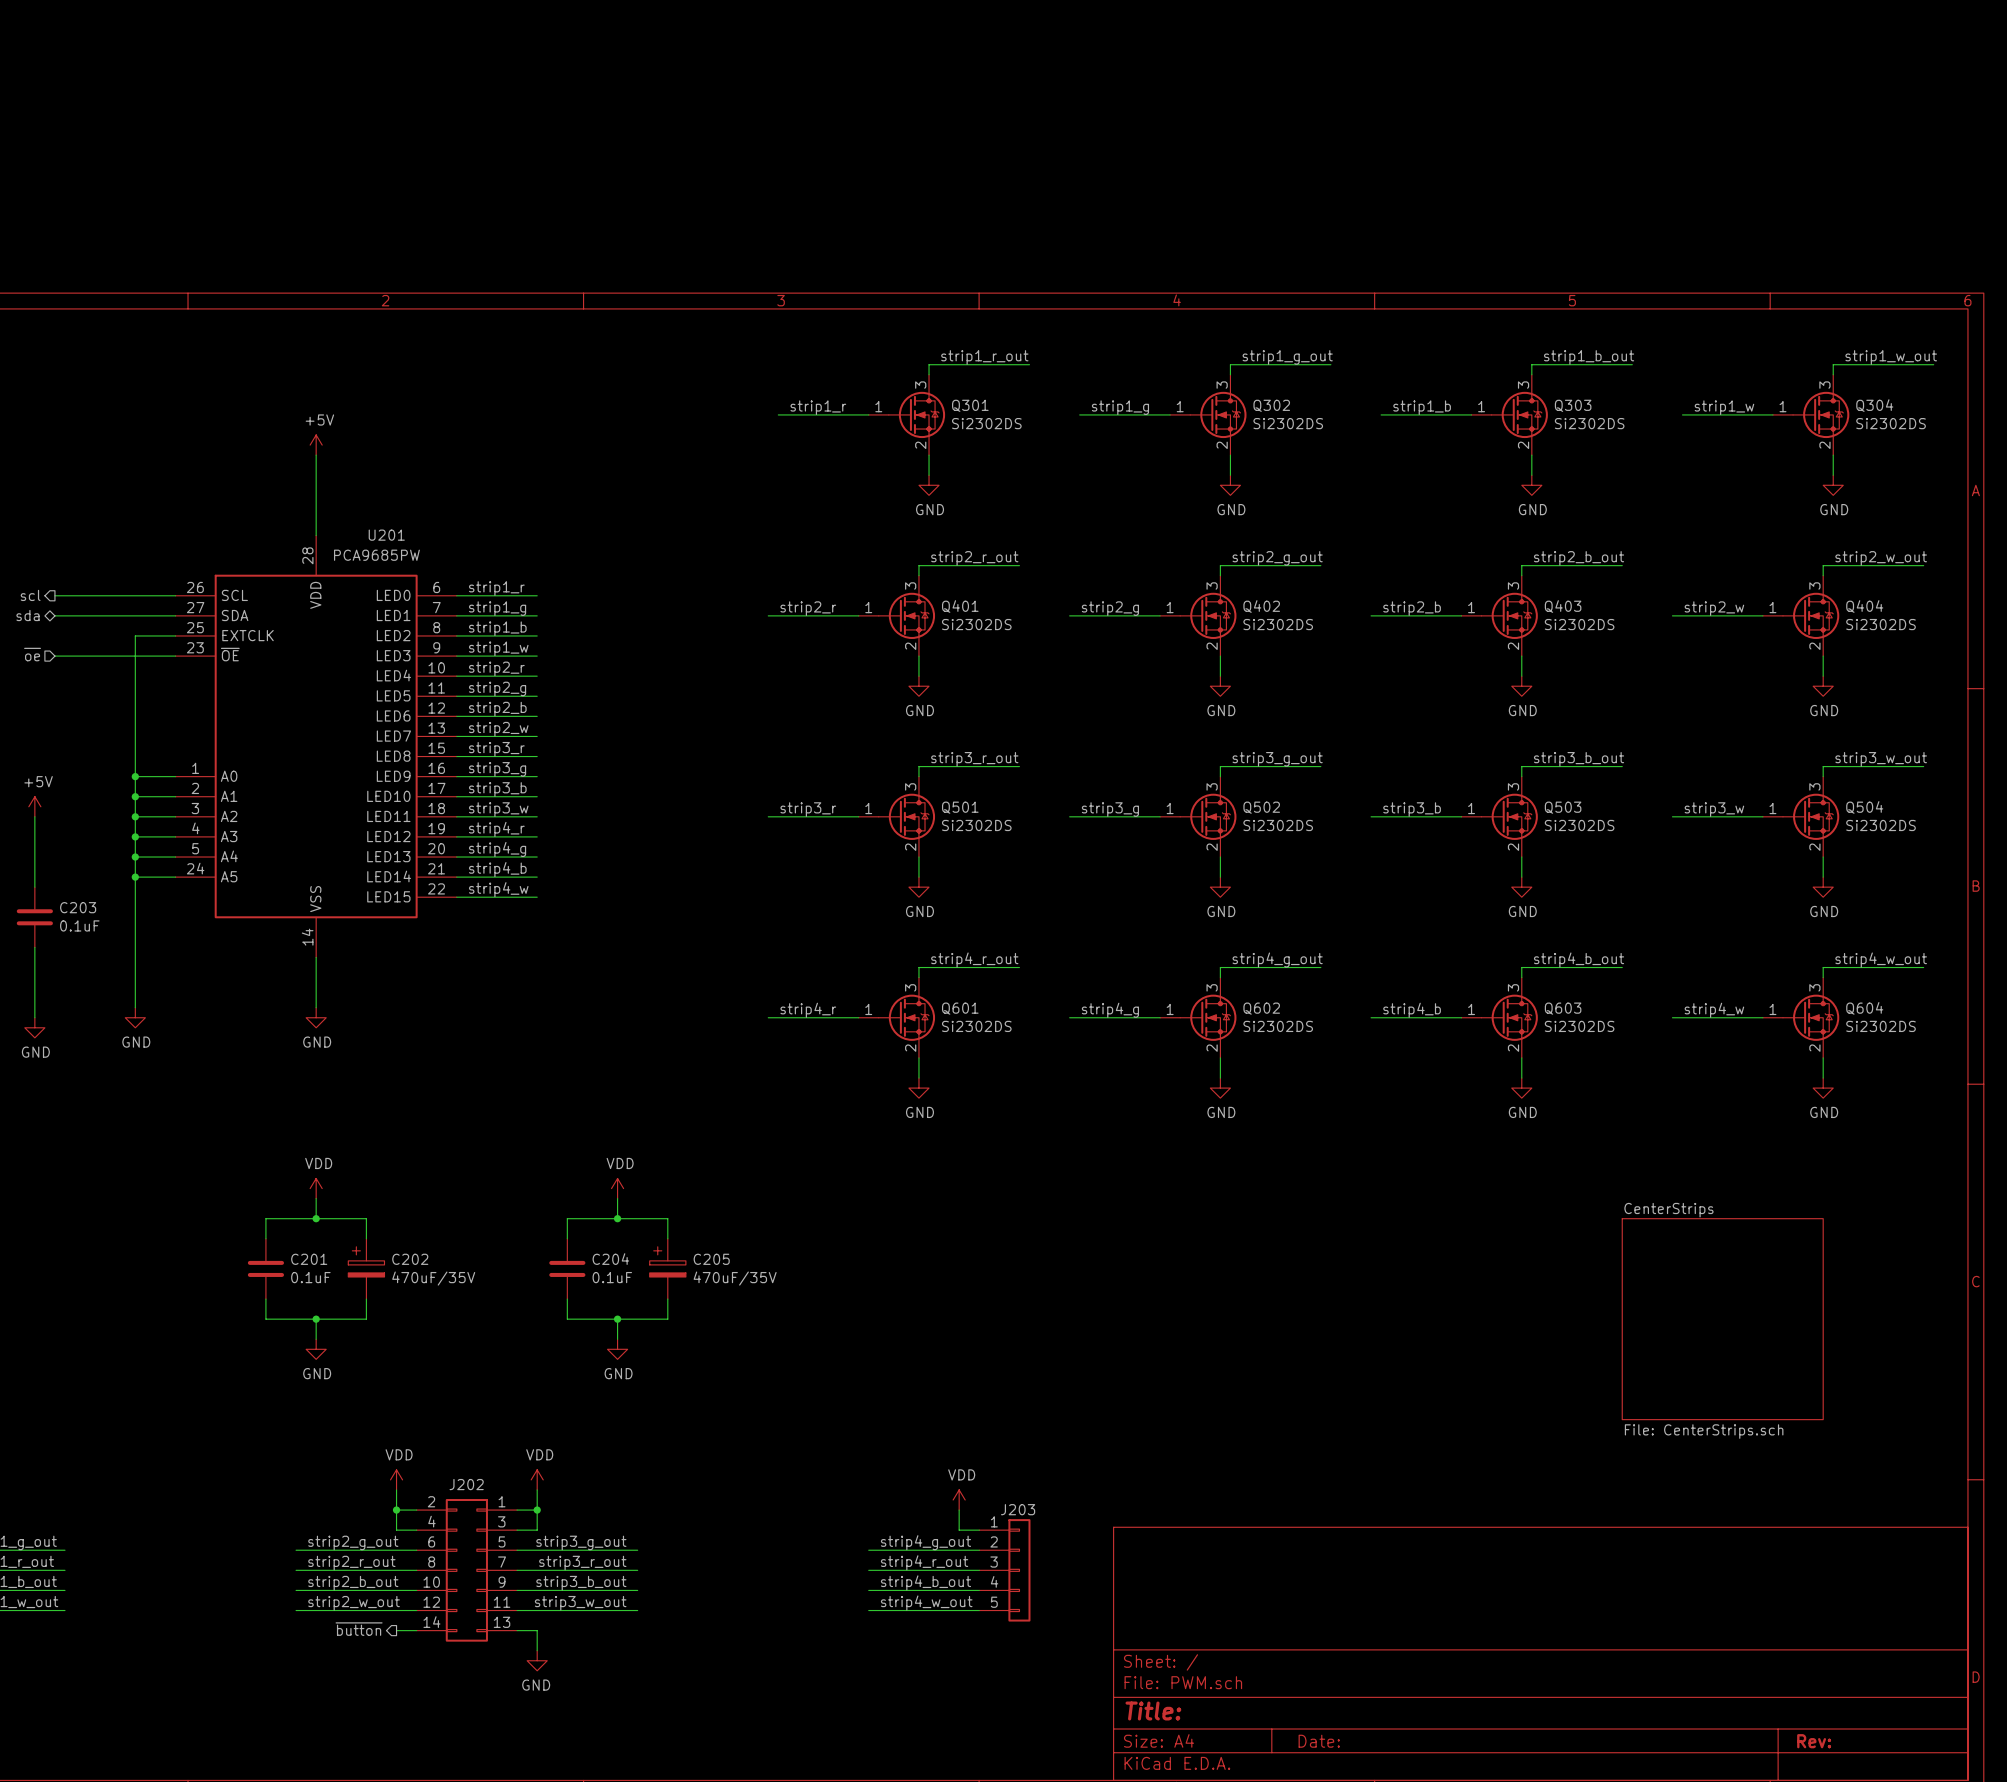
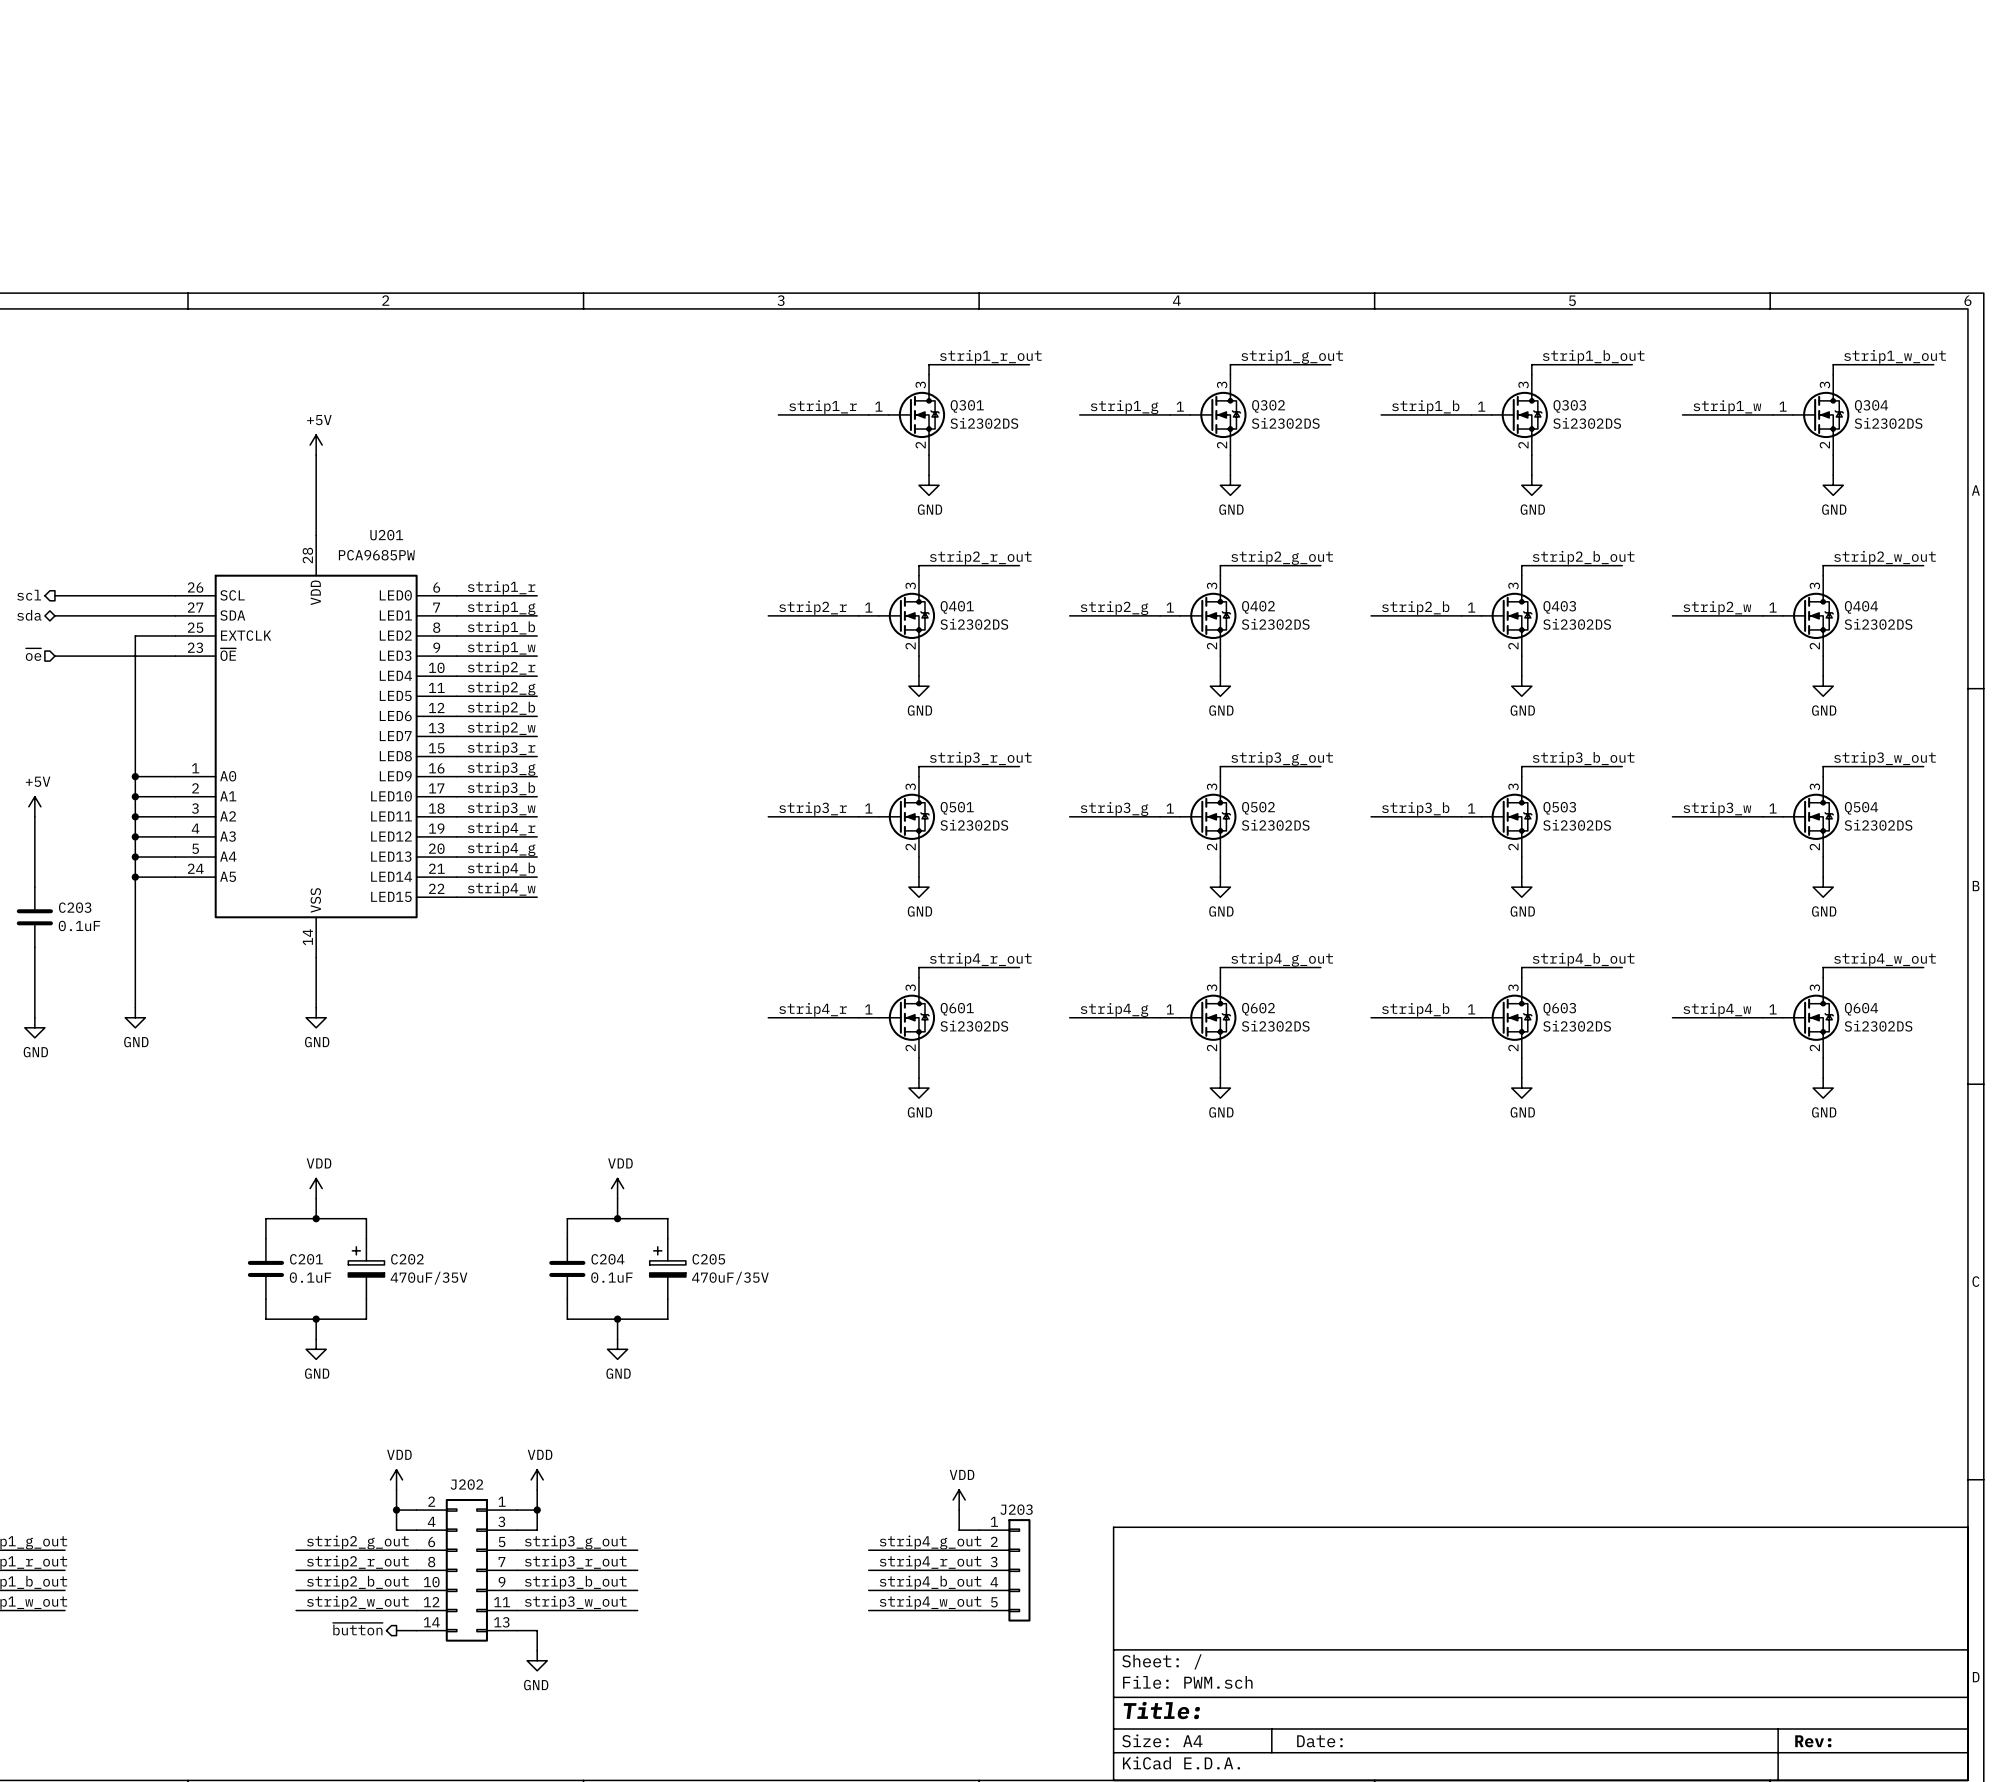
sheet CenterStrips: File: CenterStrips.sch (1722, 1319) -> none

